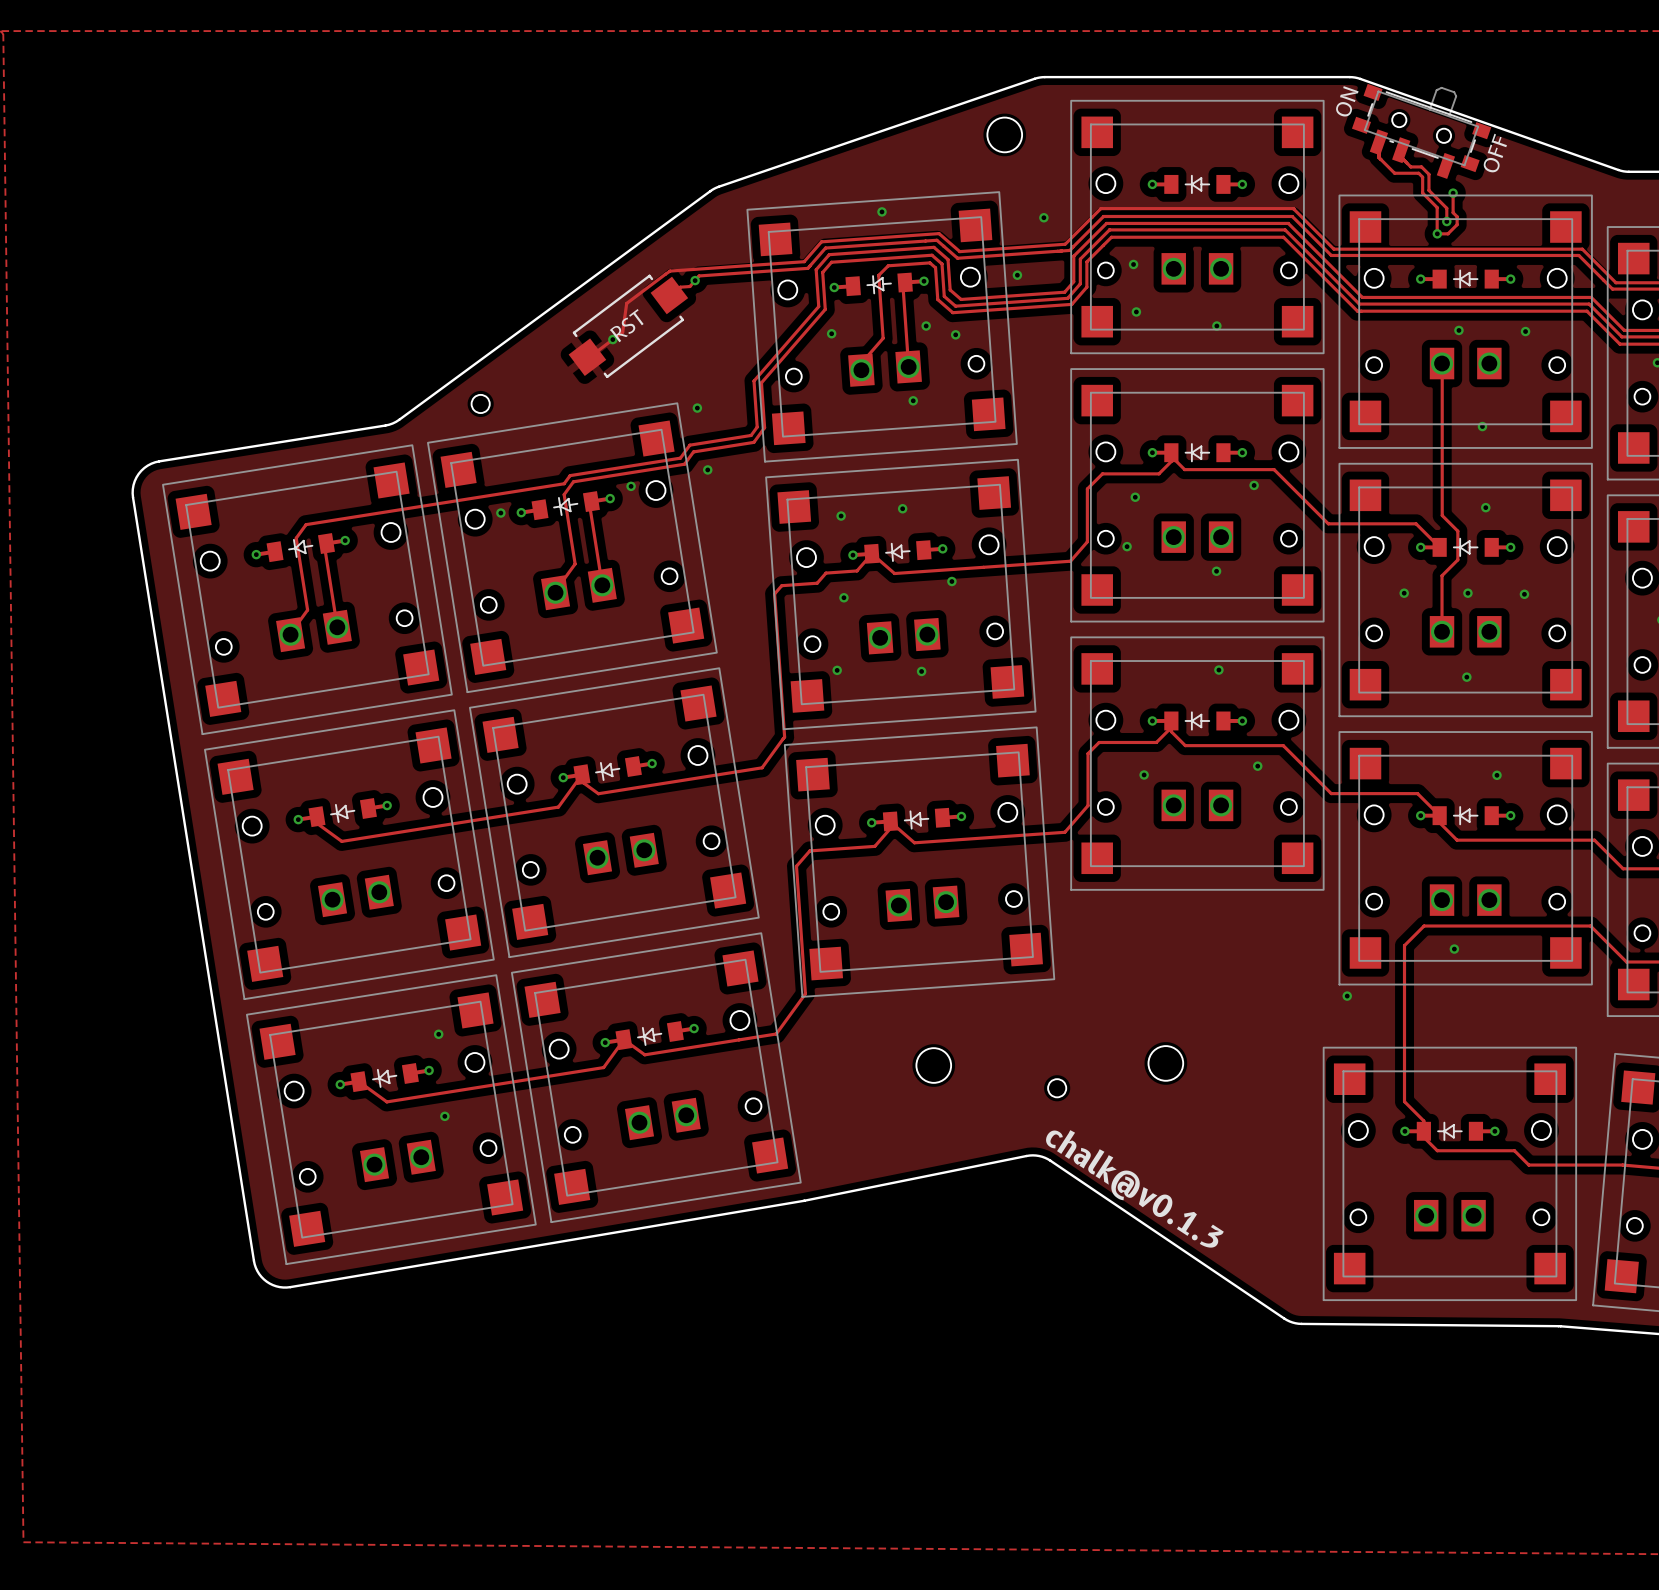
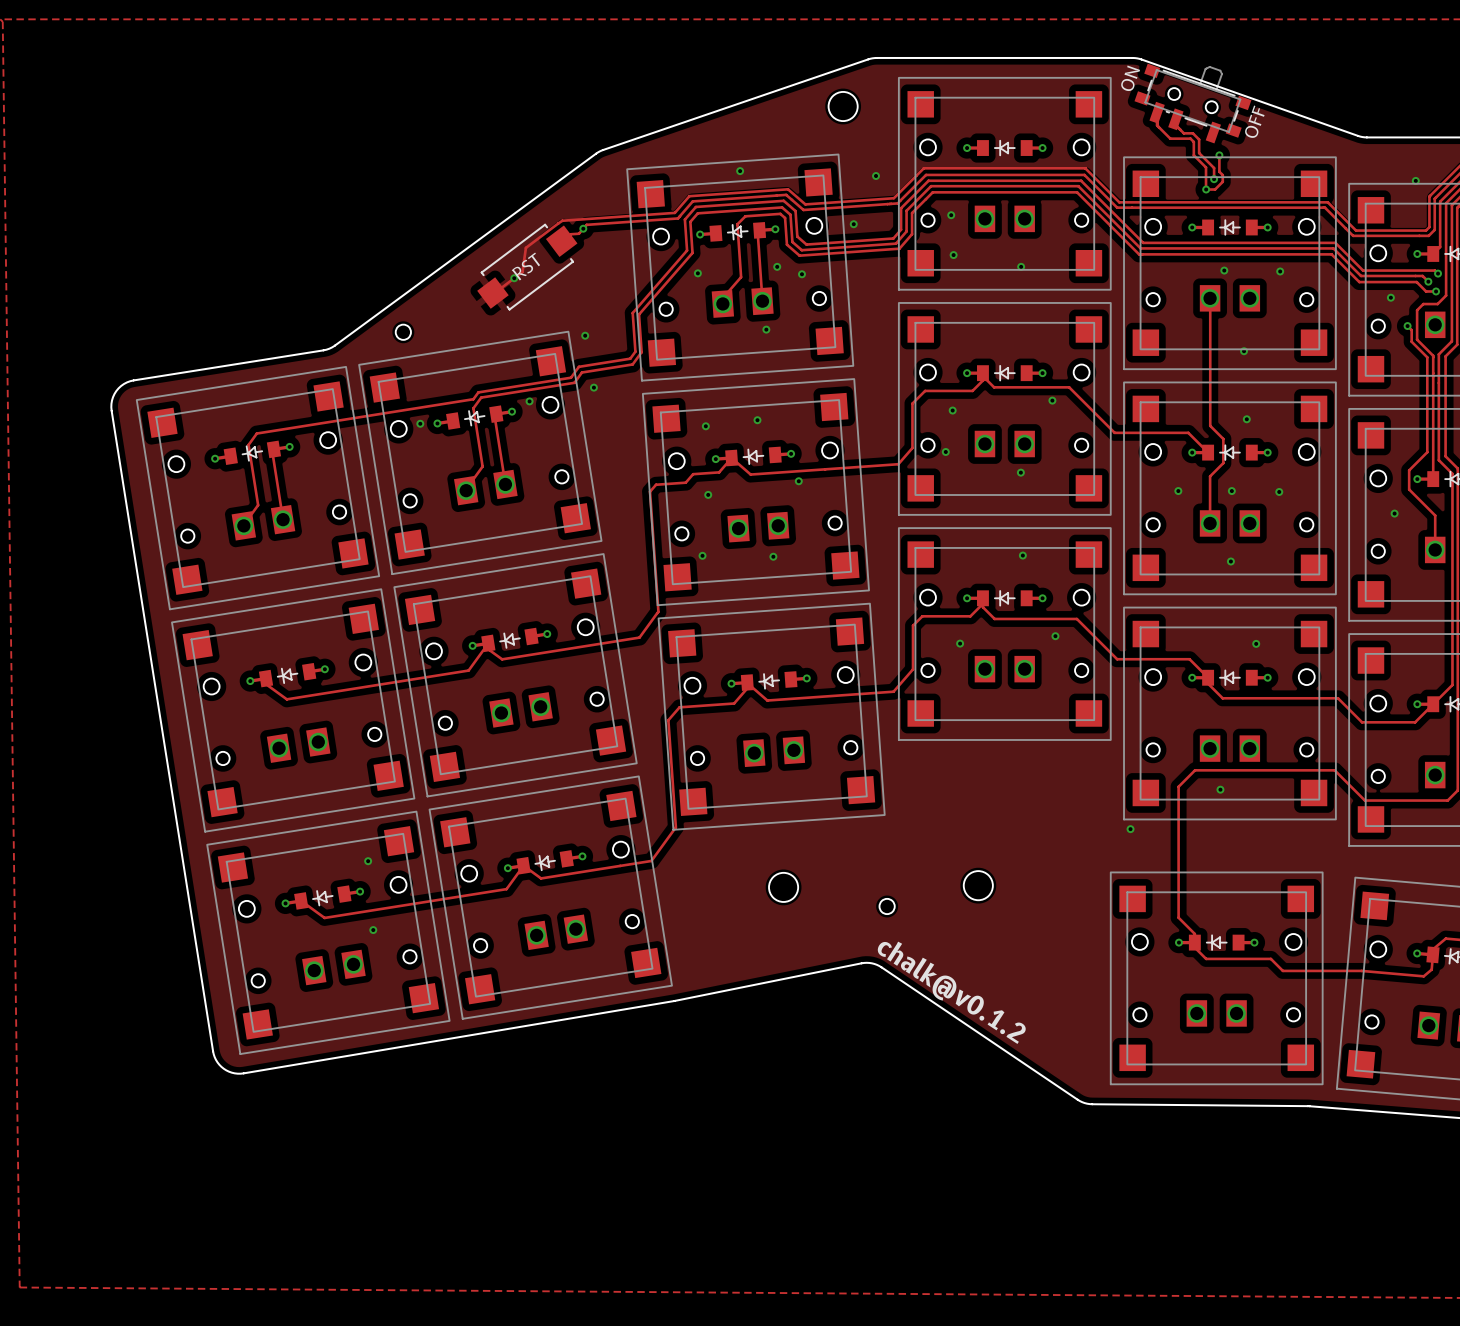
text: chalk@v0.1.3 (1134, 1188) -> chalk@v0.1.2 (951, 992)

